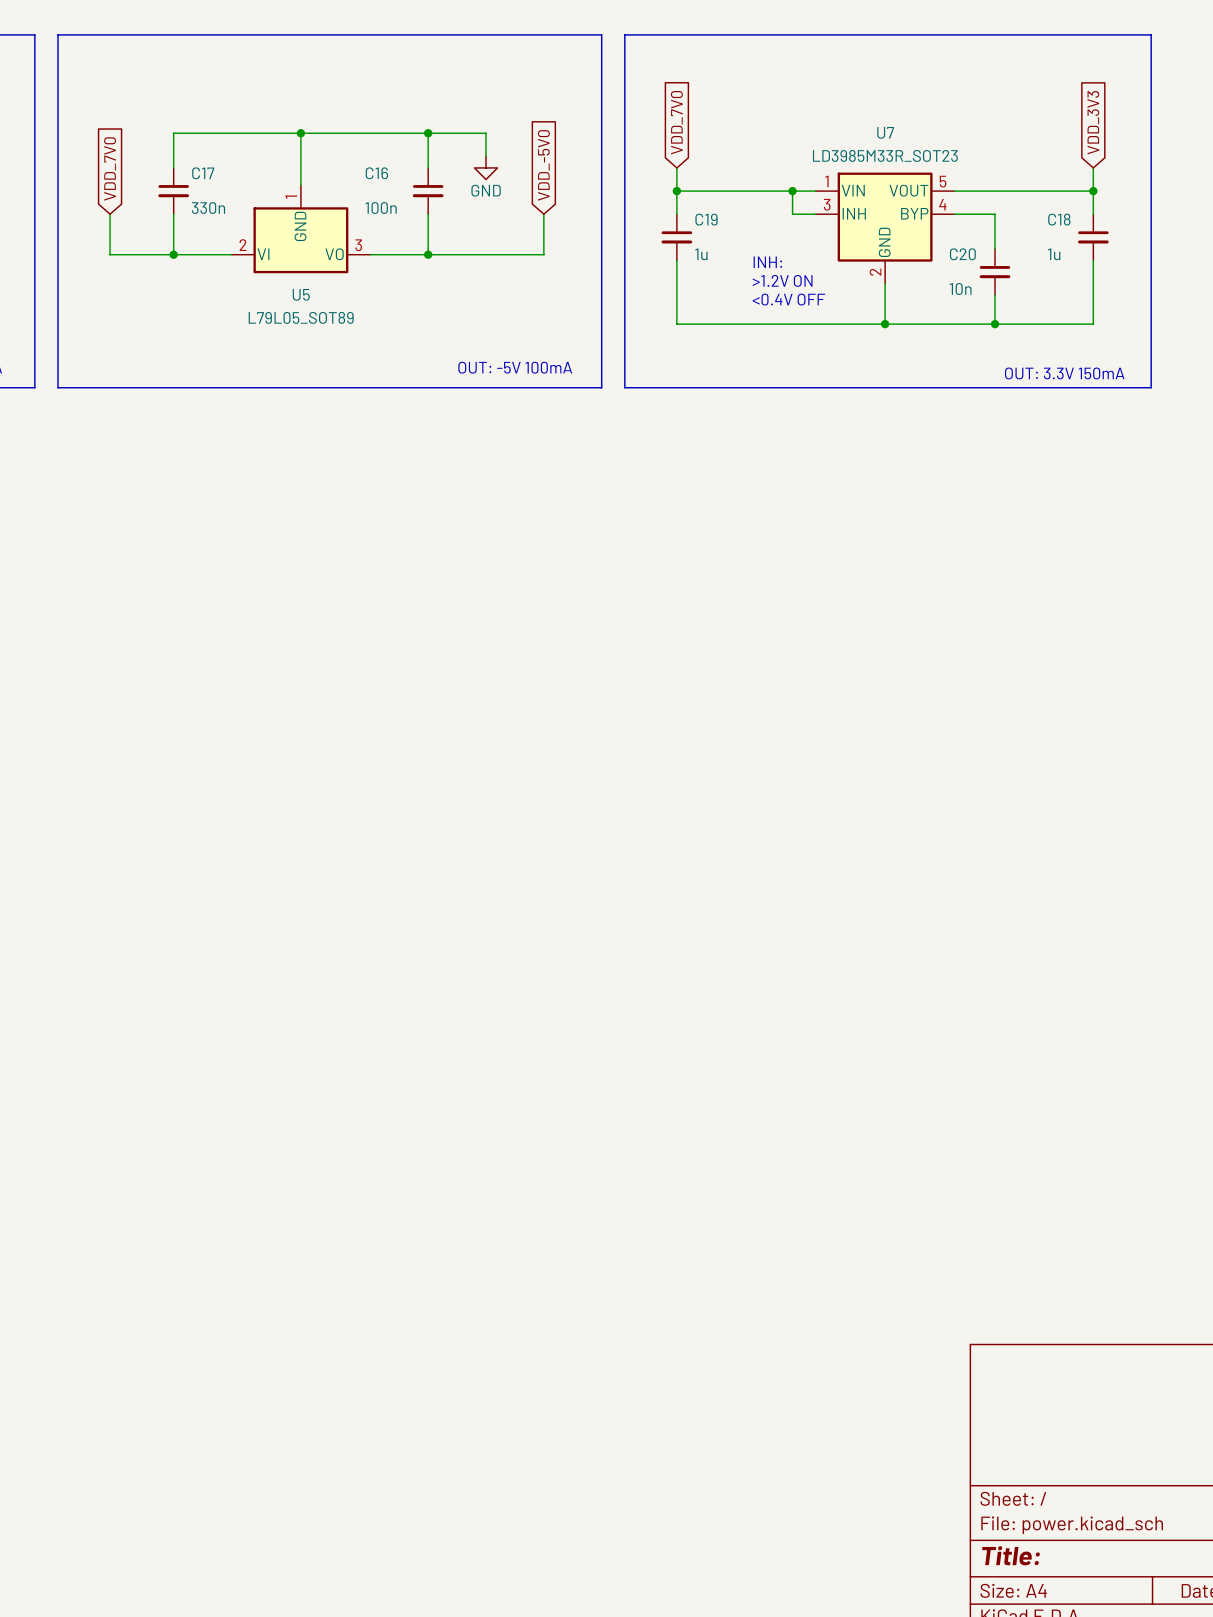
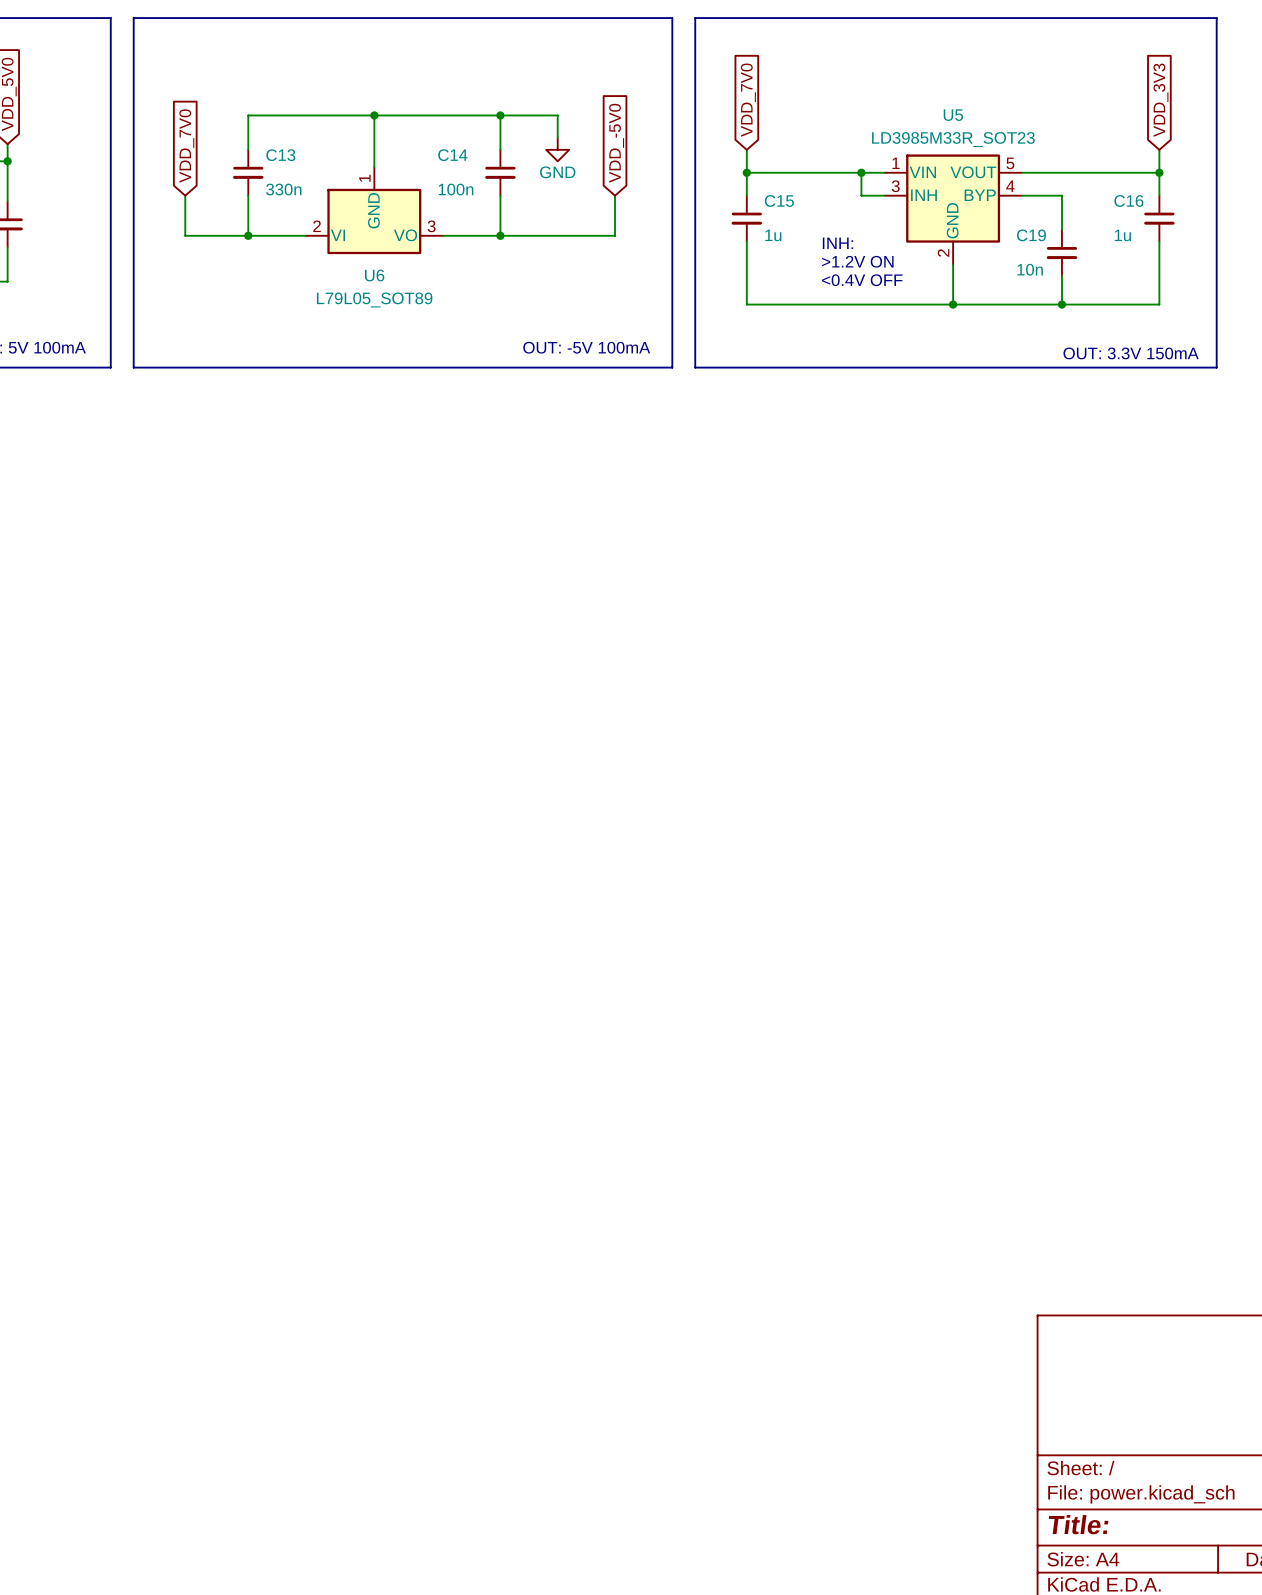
U7 name: U7 (885, 132) -> U5 (953, 115)
C17 name: C17 (203, 173) -> C13 (280, 155)
C16 name: C16 (376, 173) -> C14 (452, 155)
C19 name: C19 (706, 219) -> C15 (779, 200)
C18 name: C18 (1059, 219) -> C16 (1128, 200)
C20 name: C20 (962, 254) -> C19 (1031, 235)
U5 name: U5 (301, 294) -> U6 (374, 275)

